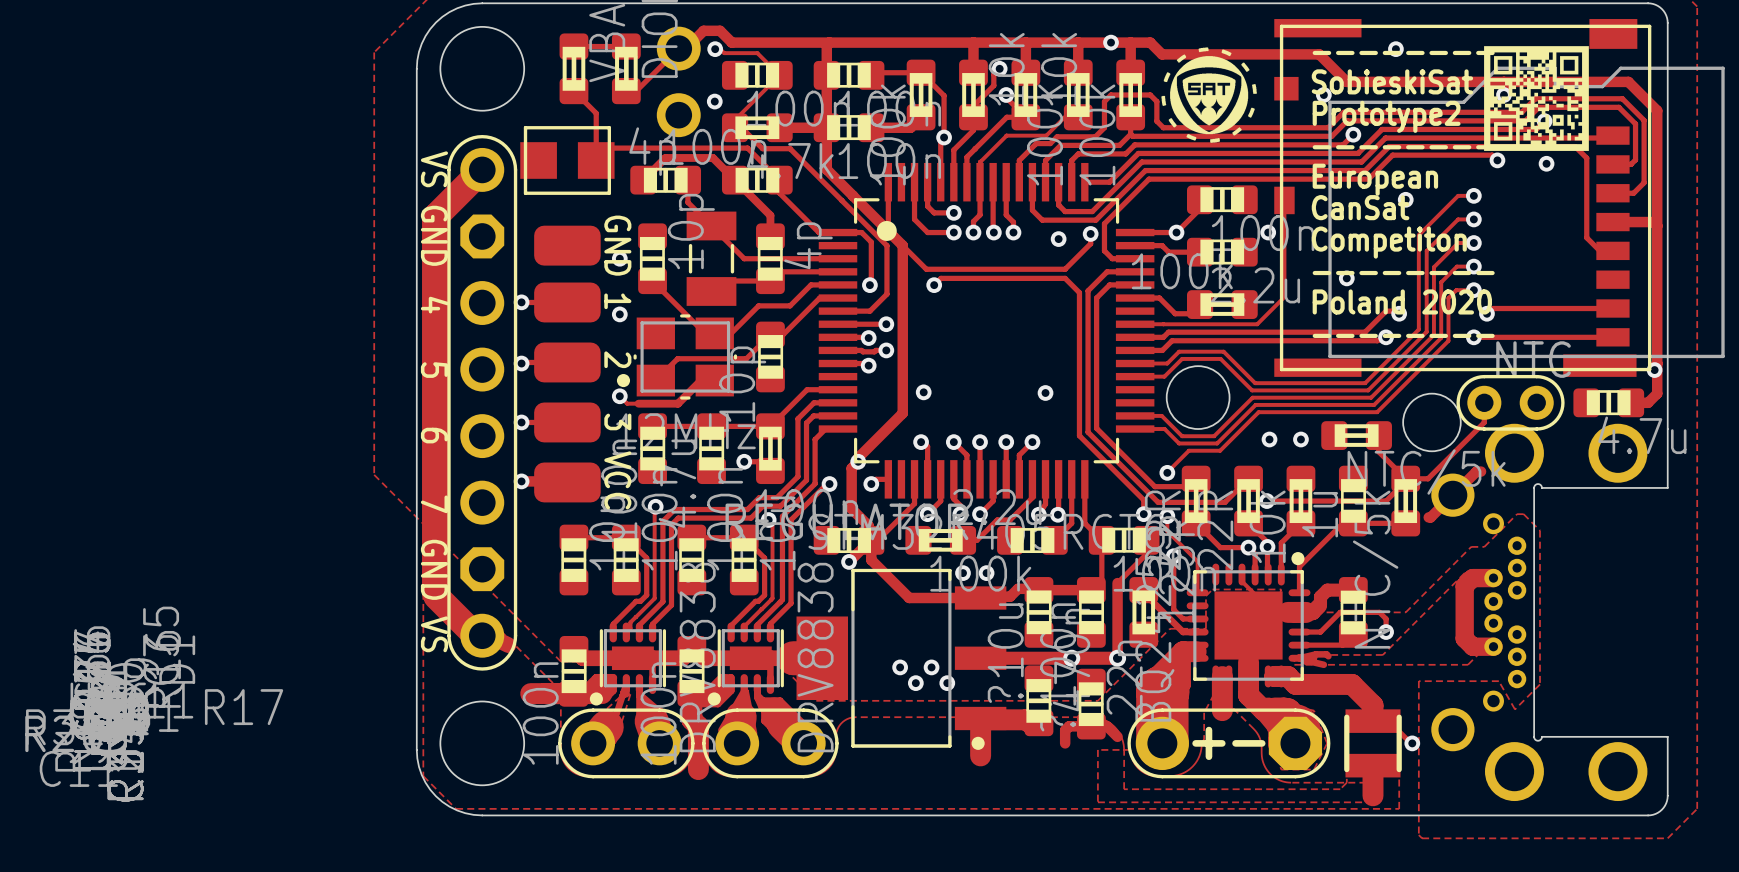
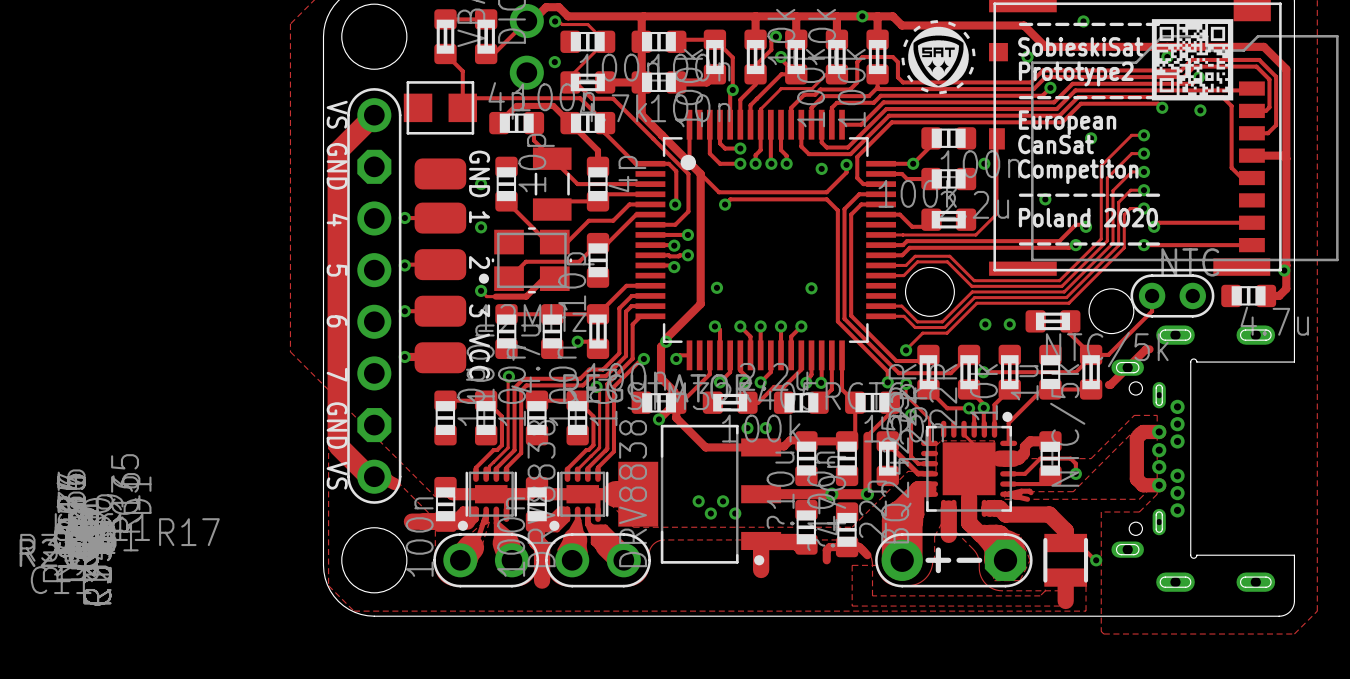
part footprint: [1431, 423, 1668, 802] -> [1111, 316, 1295, 601]
zone outline: (1461, 556) (1471, 546) (1484, 546) (1517, 514) (1523, 514) (1540, 530) (1540, 684) (1515, 709) (1498, 681) (1467, 681) -> (1134, 415) (1157, 415) (1157, 494) (1139, 512)

